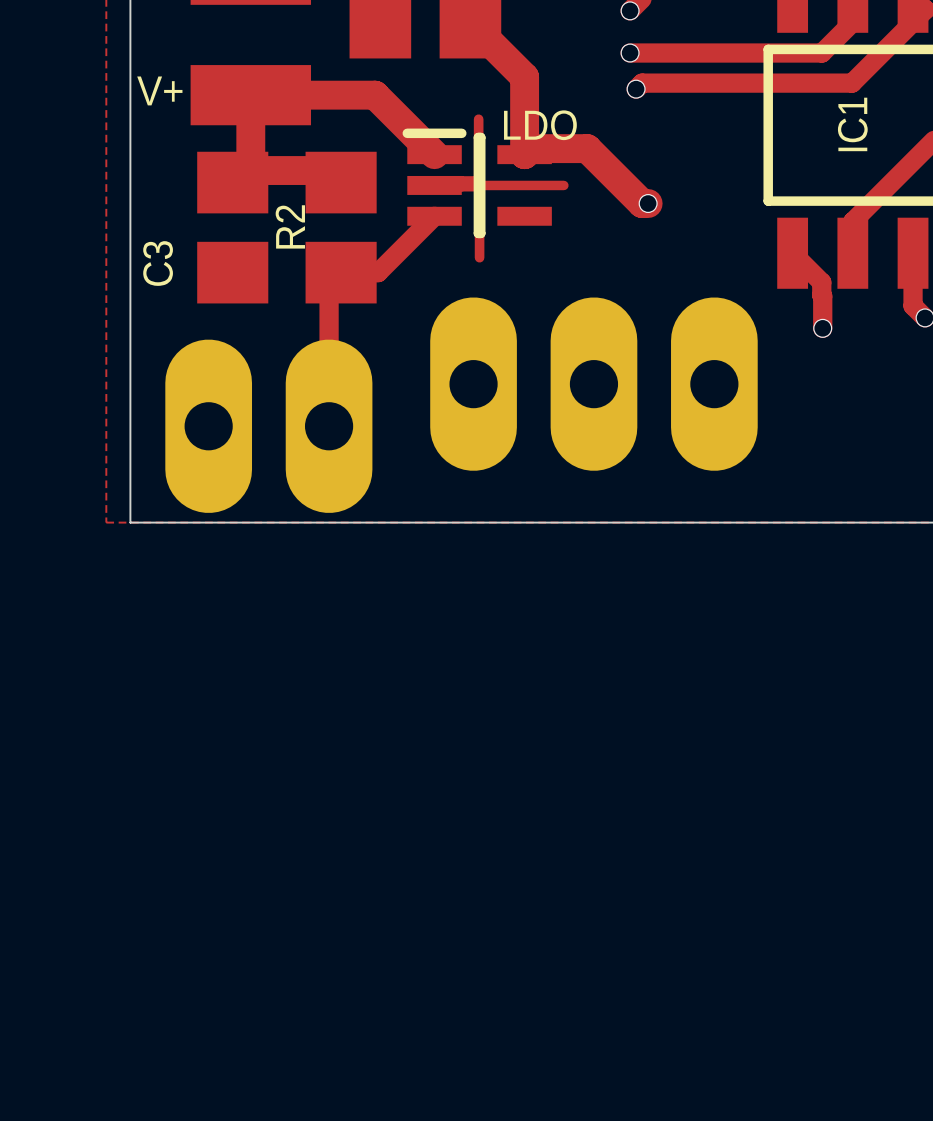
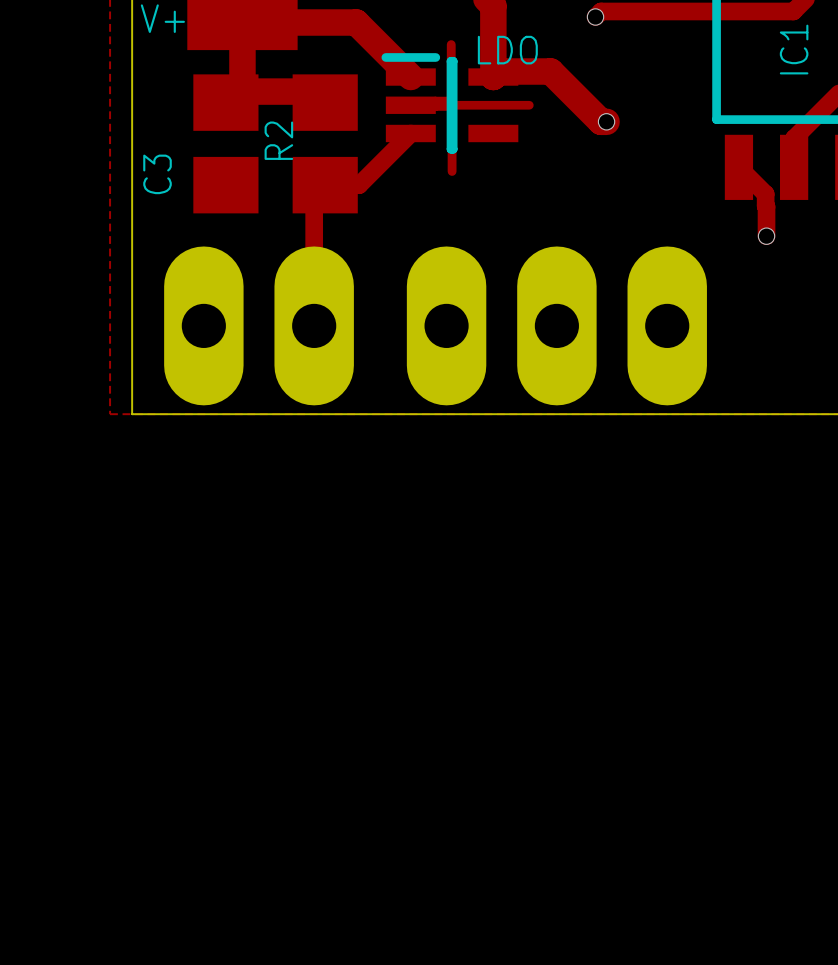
part position: (593, 384) -> (556, 325)

